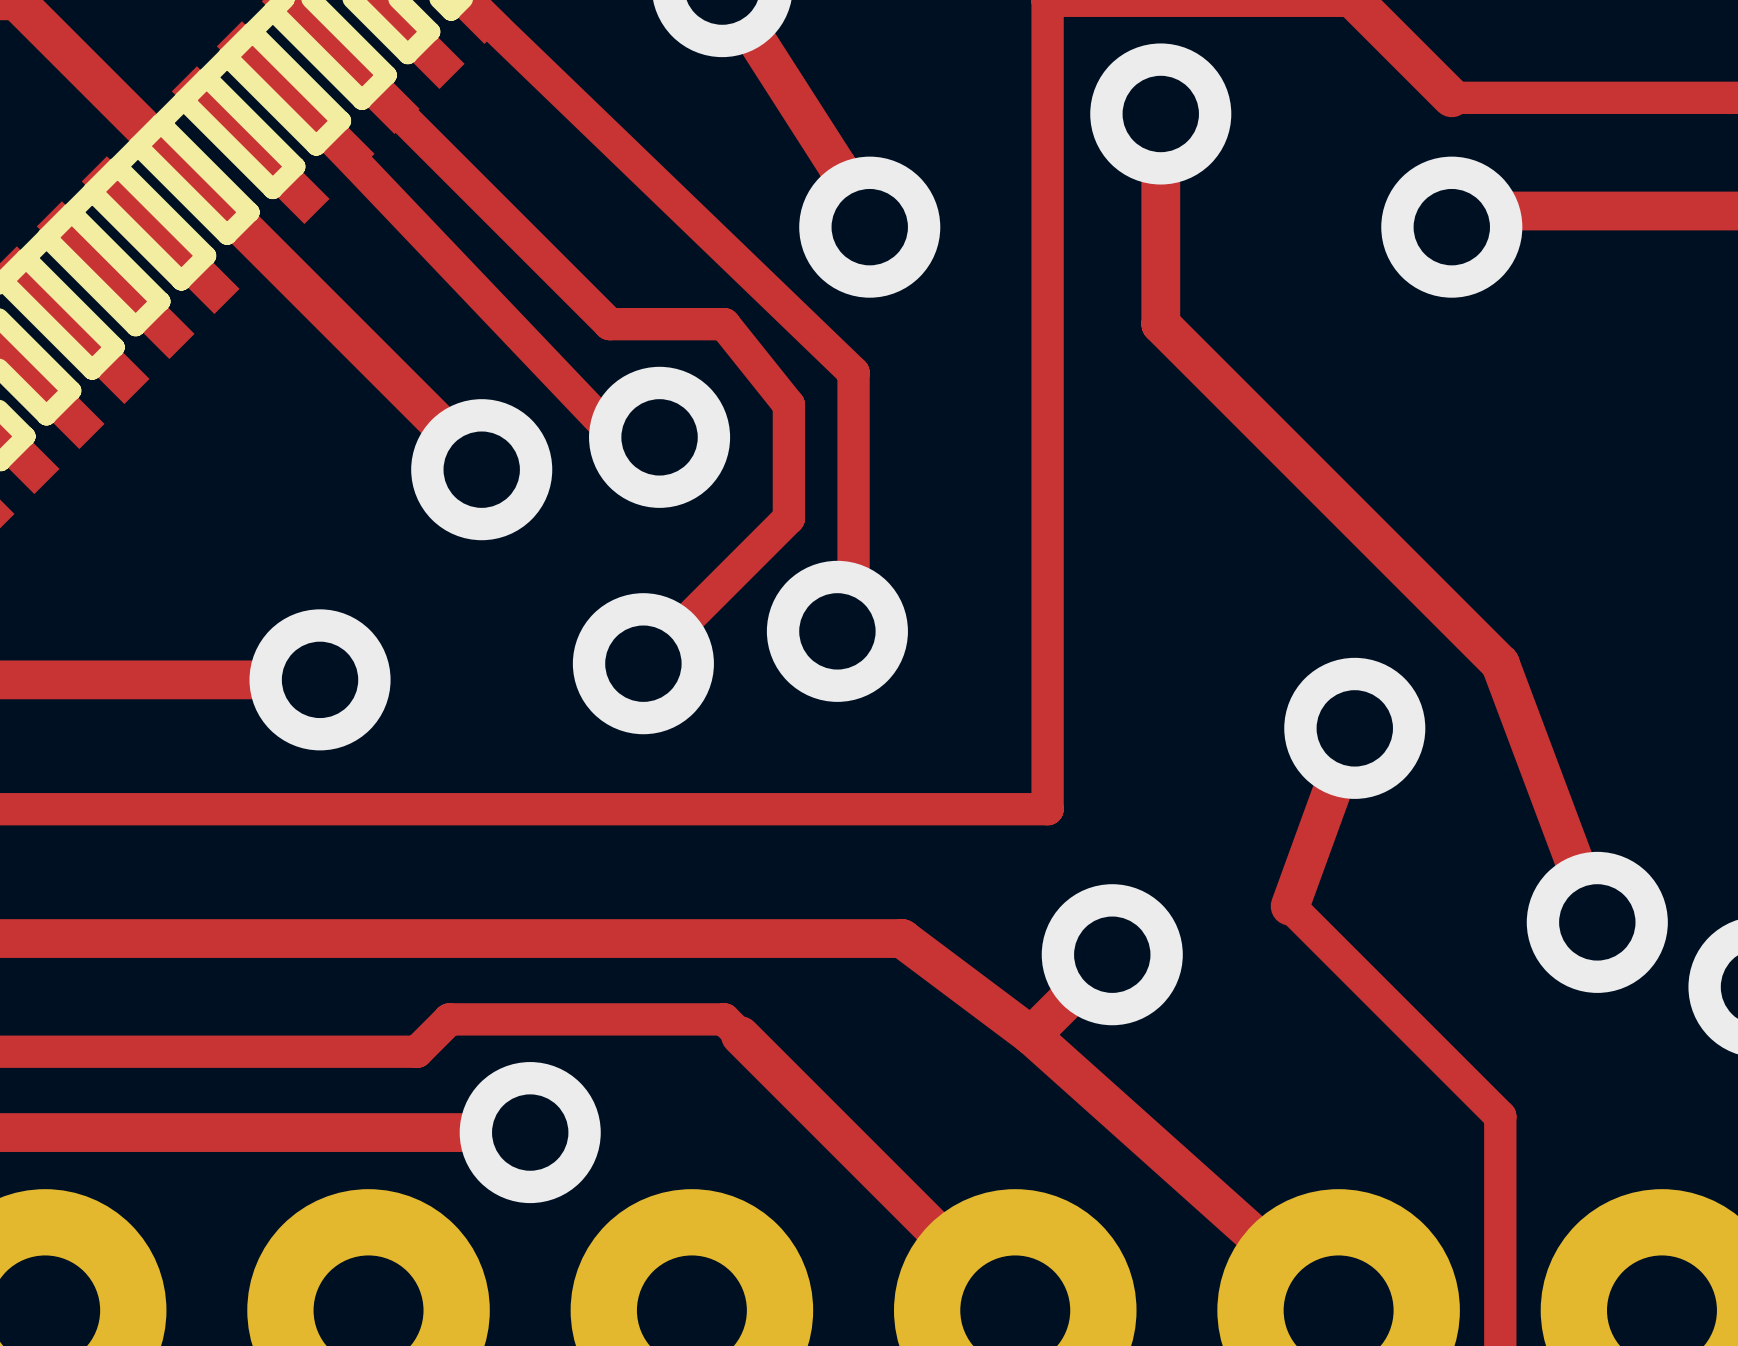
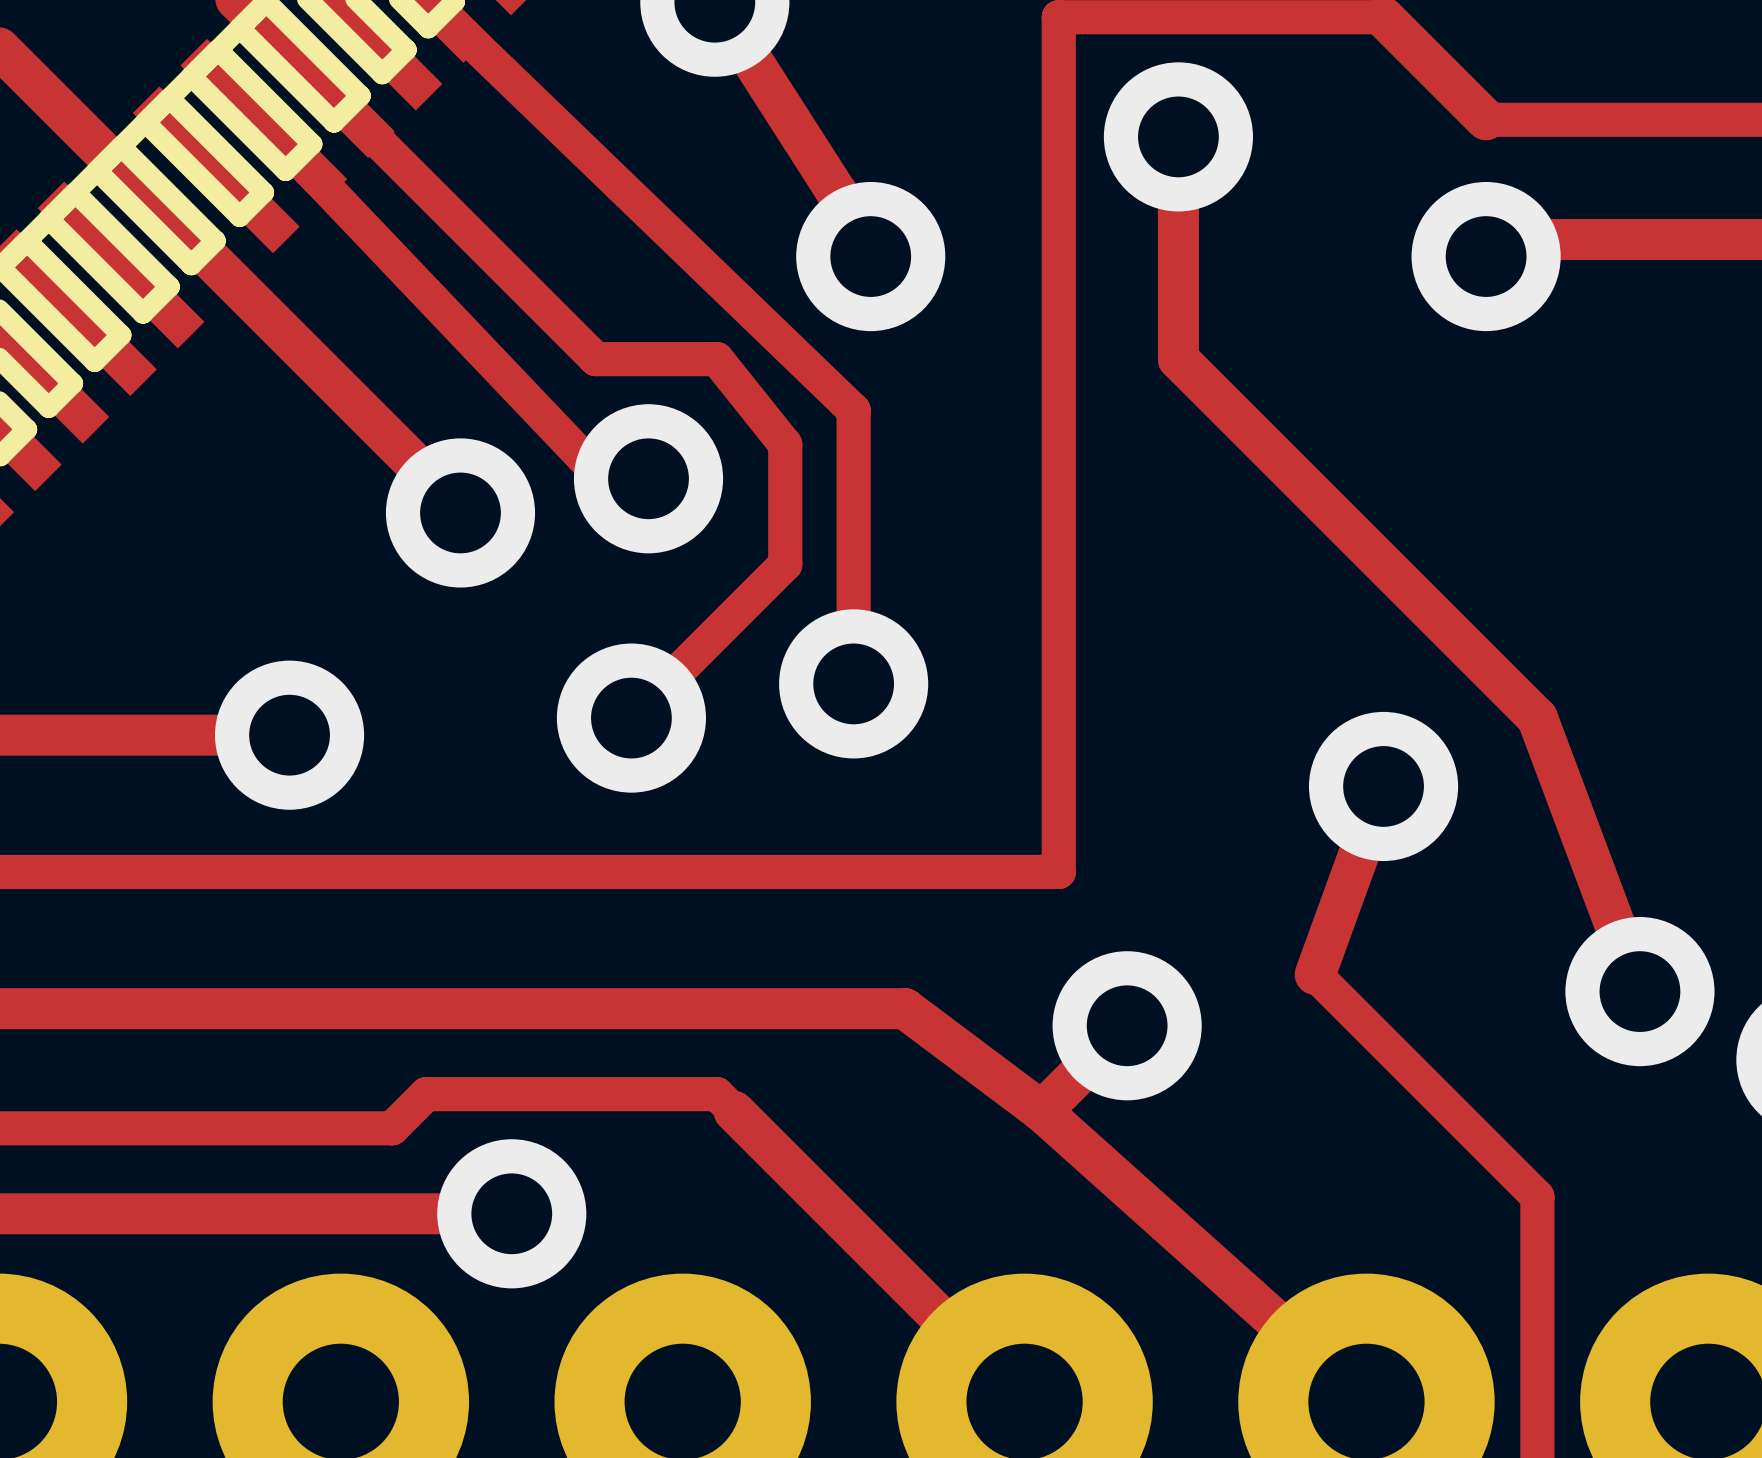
via position: (837, 631) -> (853, 683)

